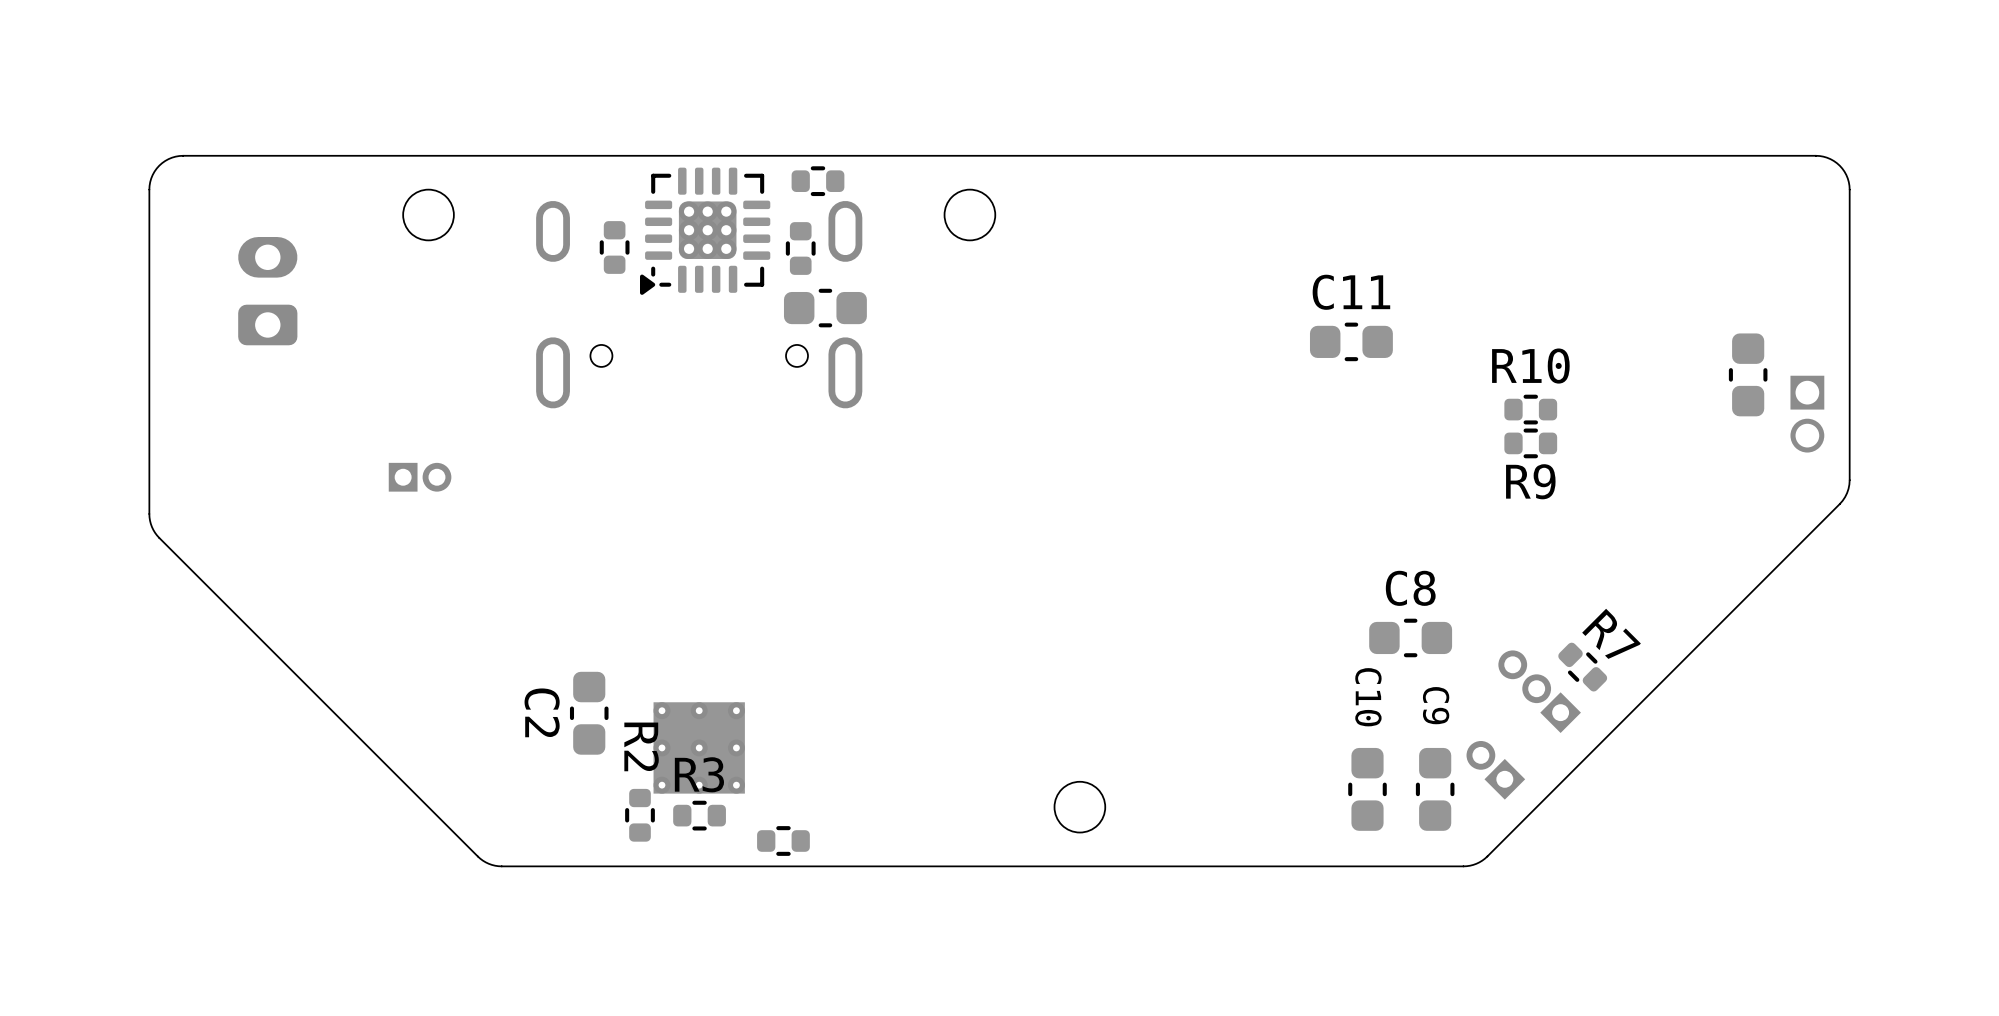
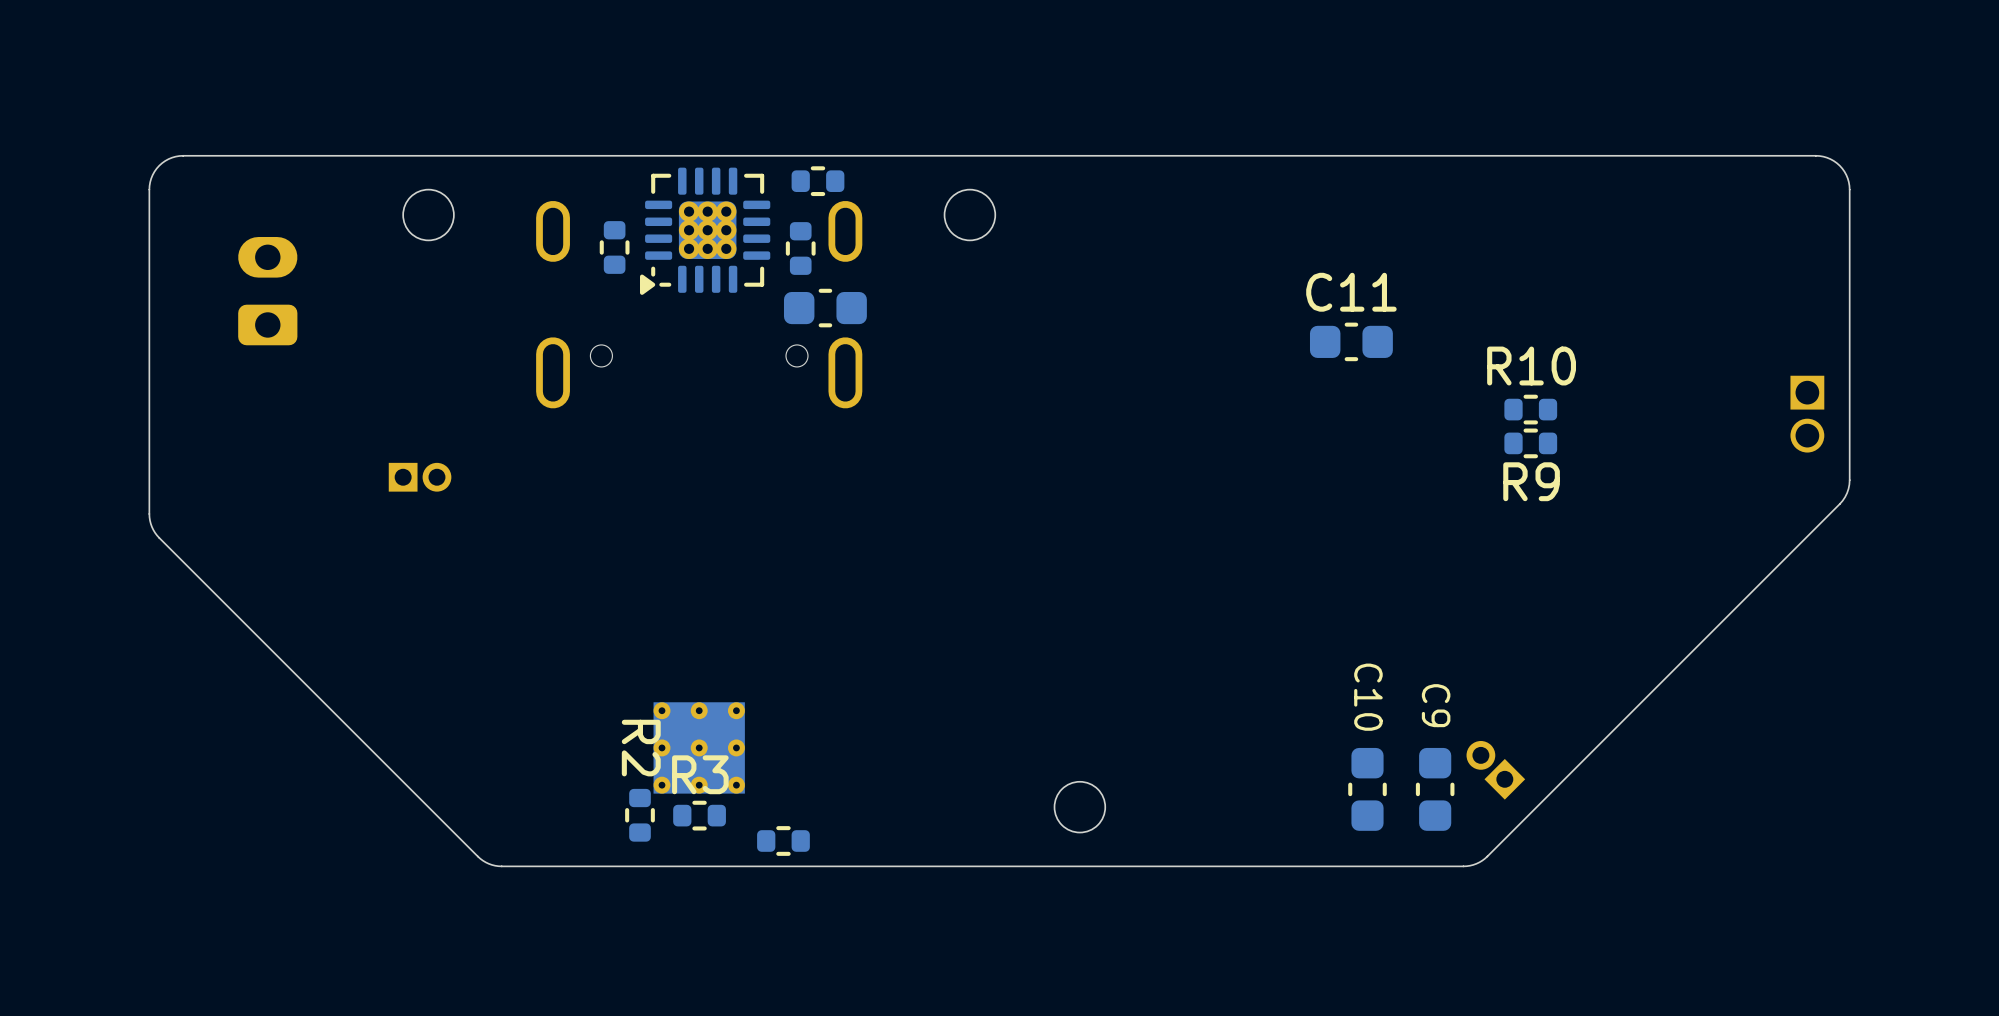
part: (1748, 374) -> none
C8: (1410, 637) -> none
R7: (1582, 667) -> none
part: (1539, 691) -> none
C2: (589, 713) -> none

